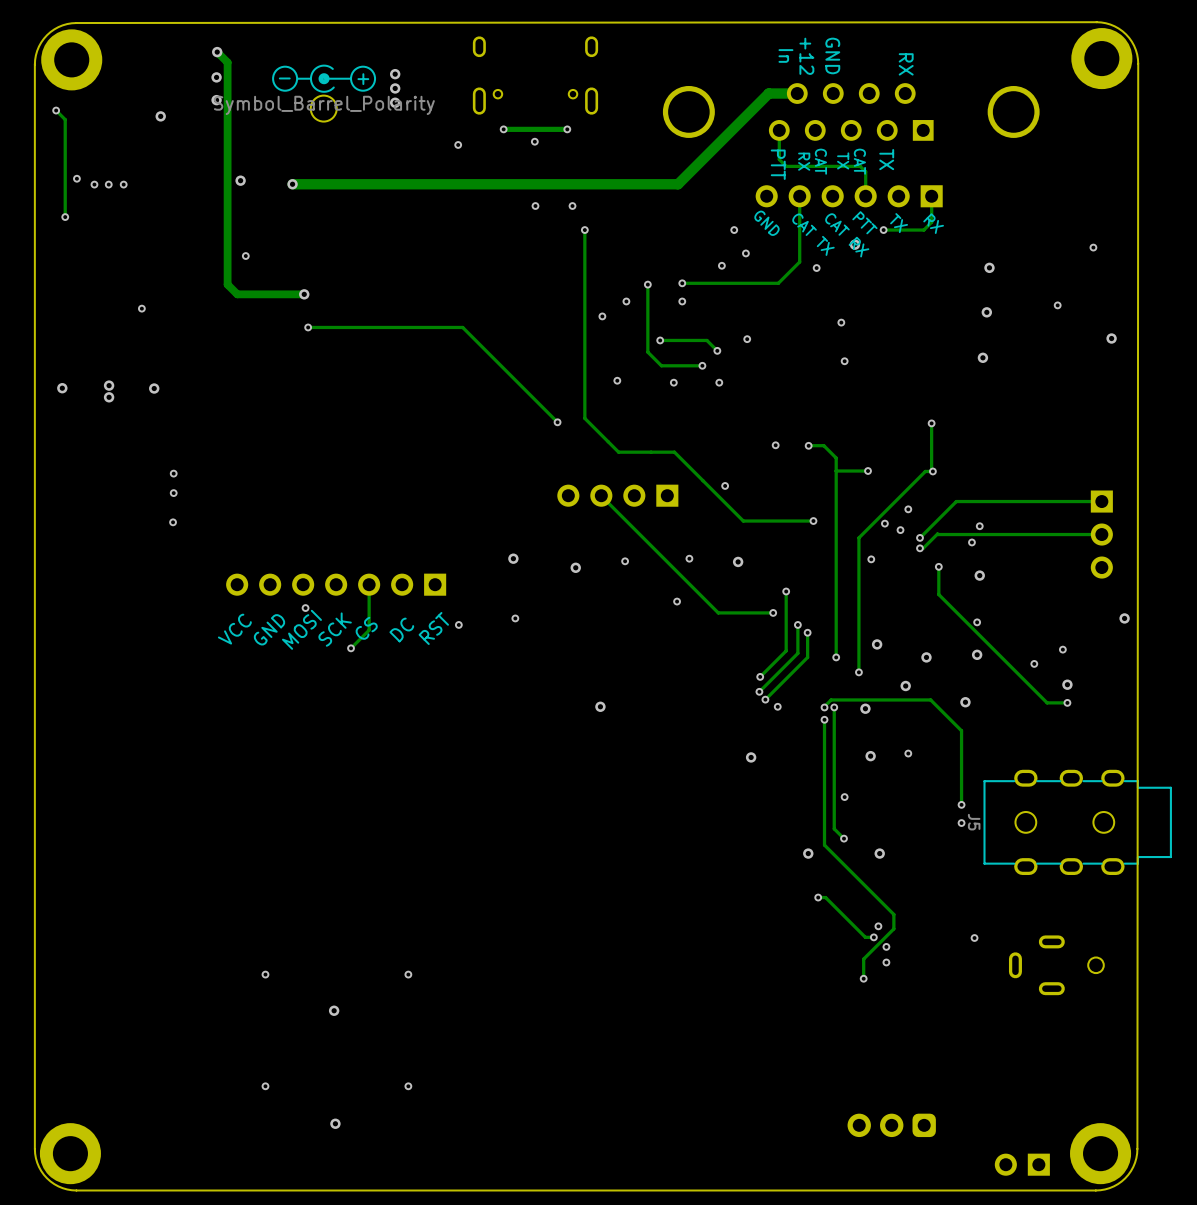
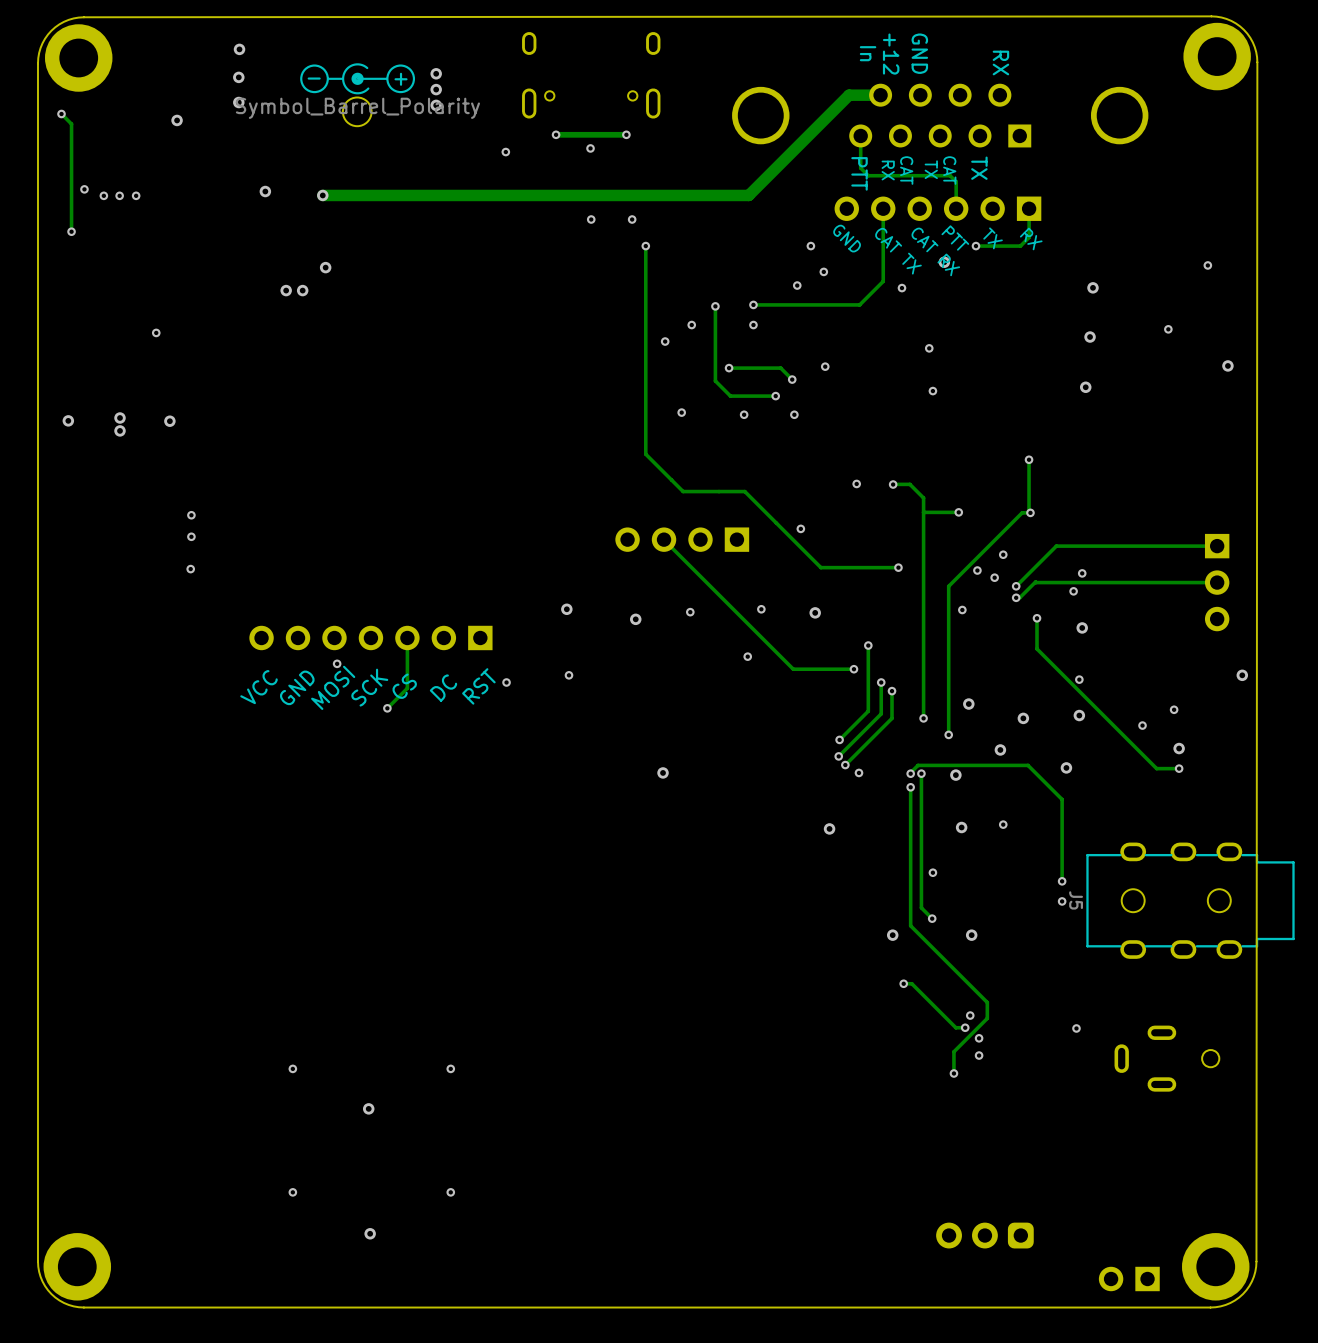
track: (217, 52) (227, 62) (227, 284) (237, 294) (304, 294) -> none
via: none -> (325, 267)
via: (245, 256) -> none
via: none -> (286, 290)
via: none -> (302, 290)
via: (304, 294) -> none
track: (308, 327) (462, 327) (557, 422) -> none
via: (308, 327) -> none
via: (557, 422) -> none

